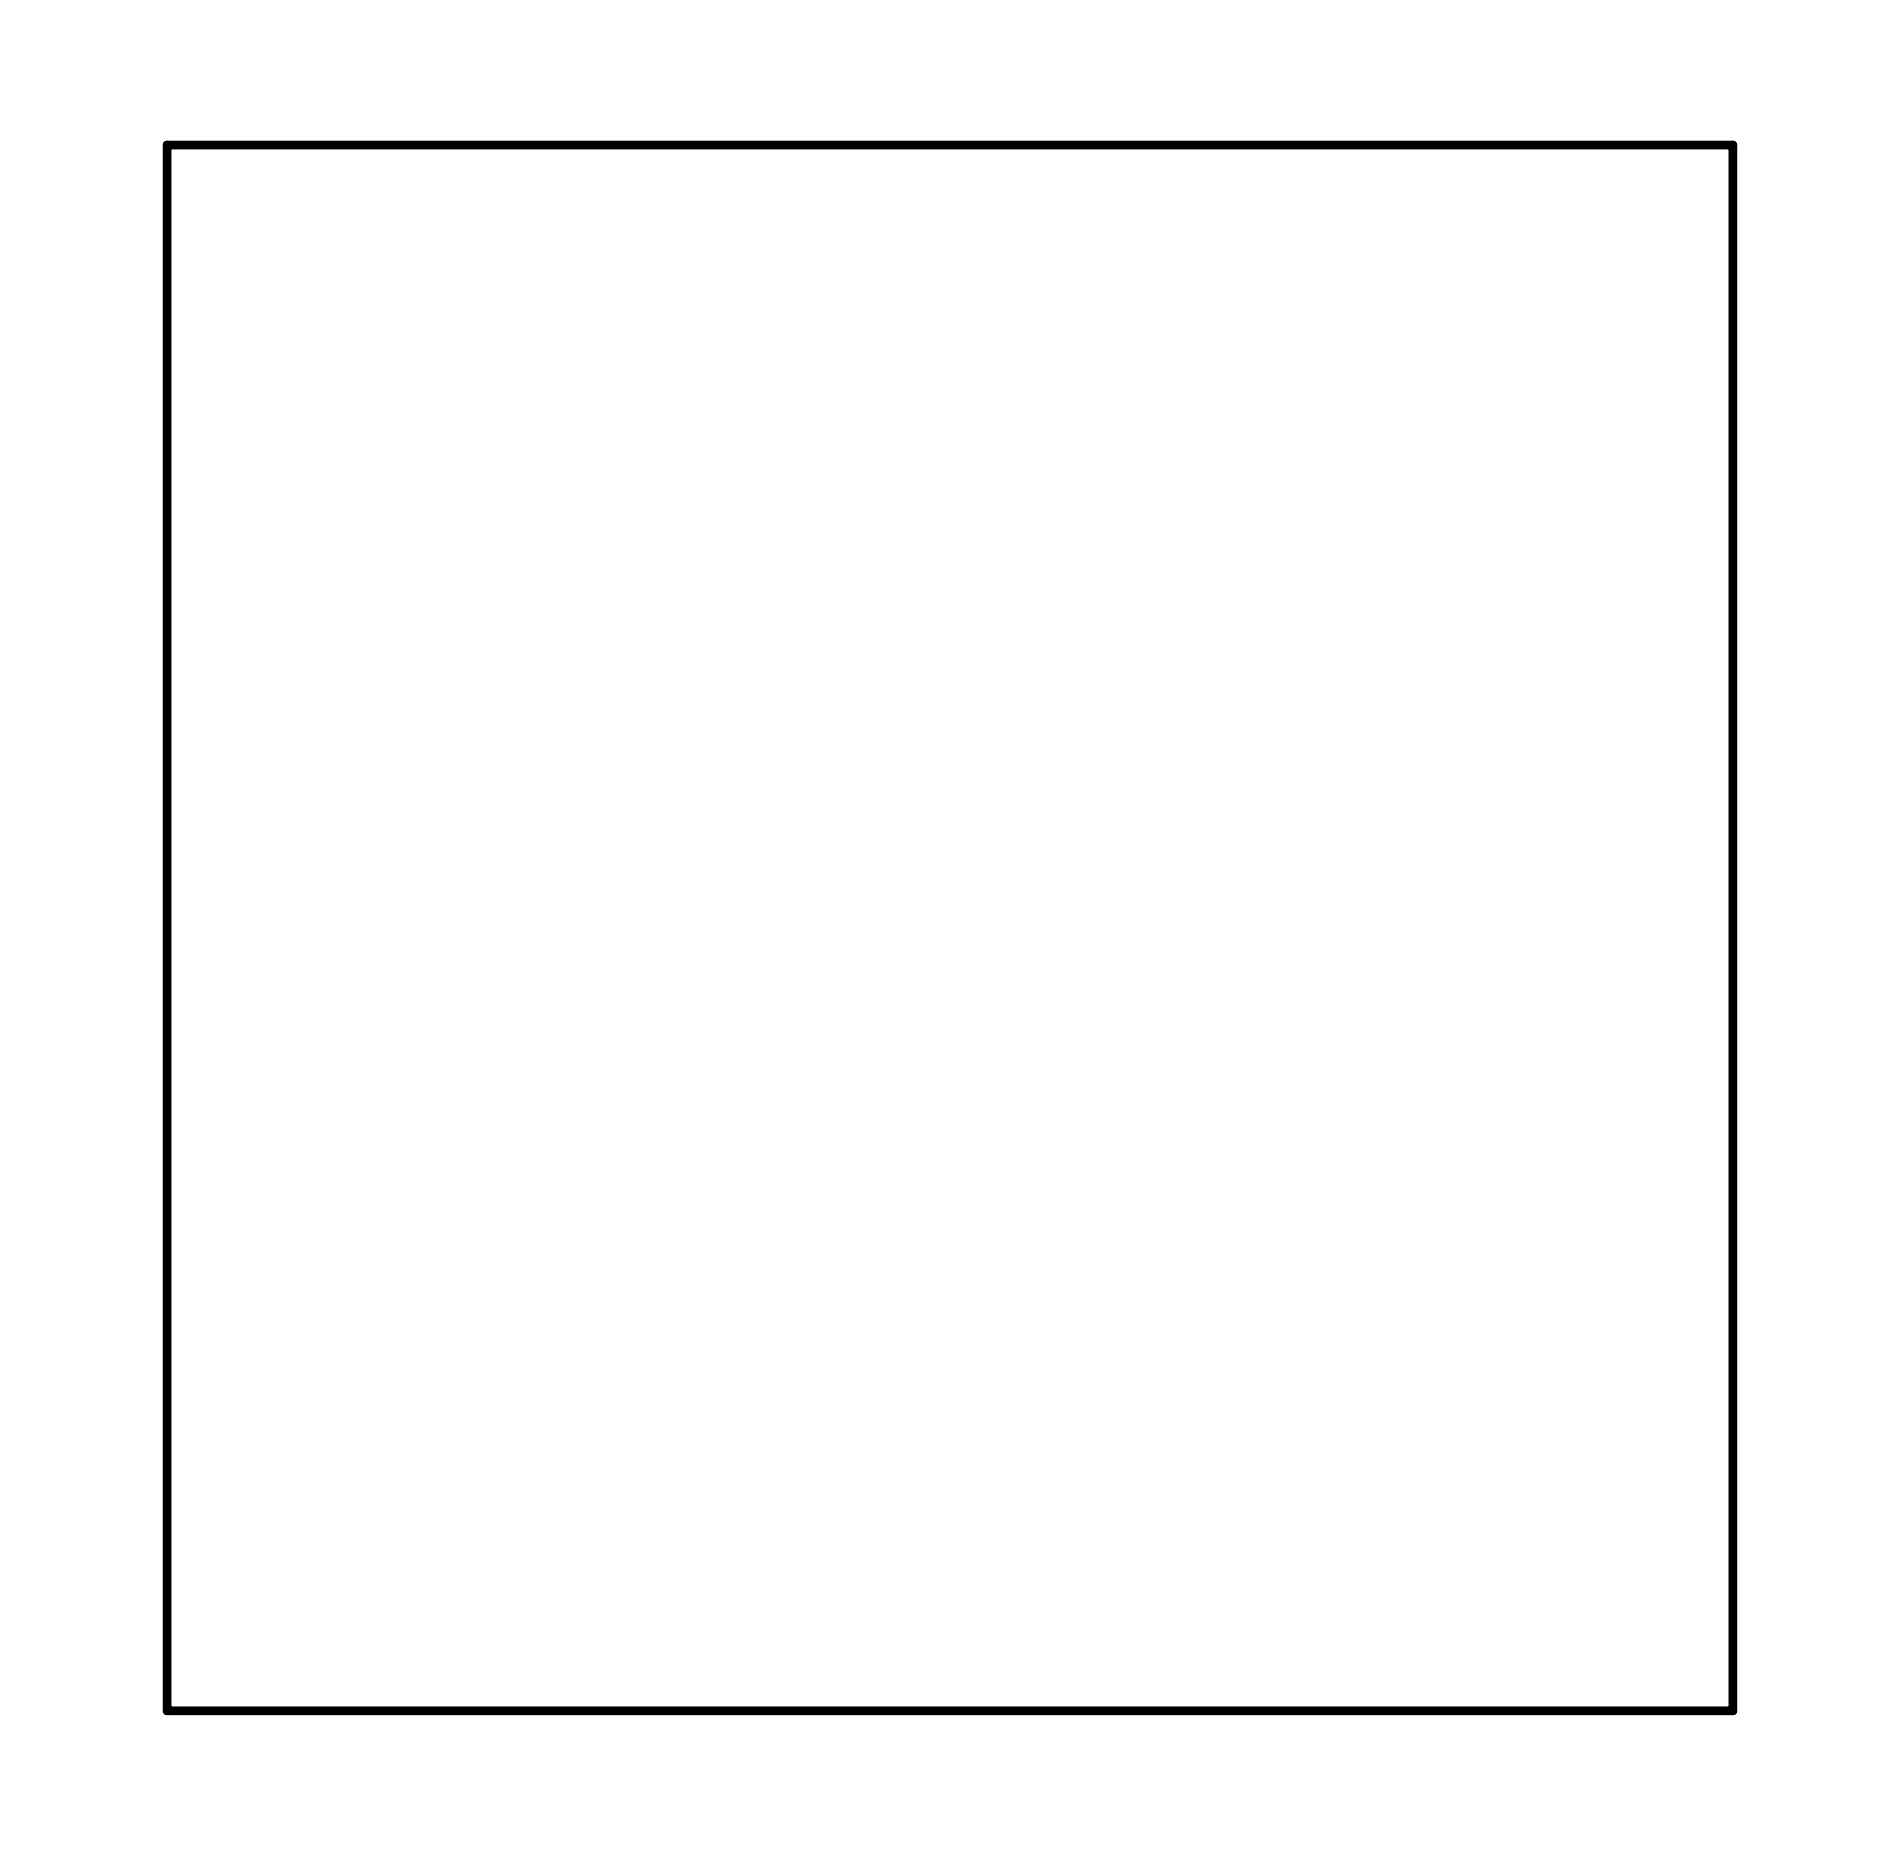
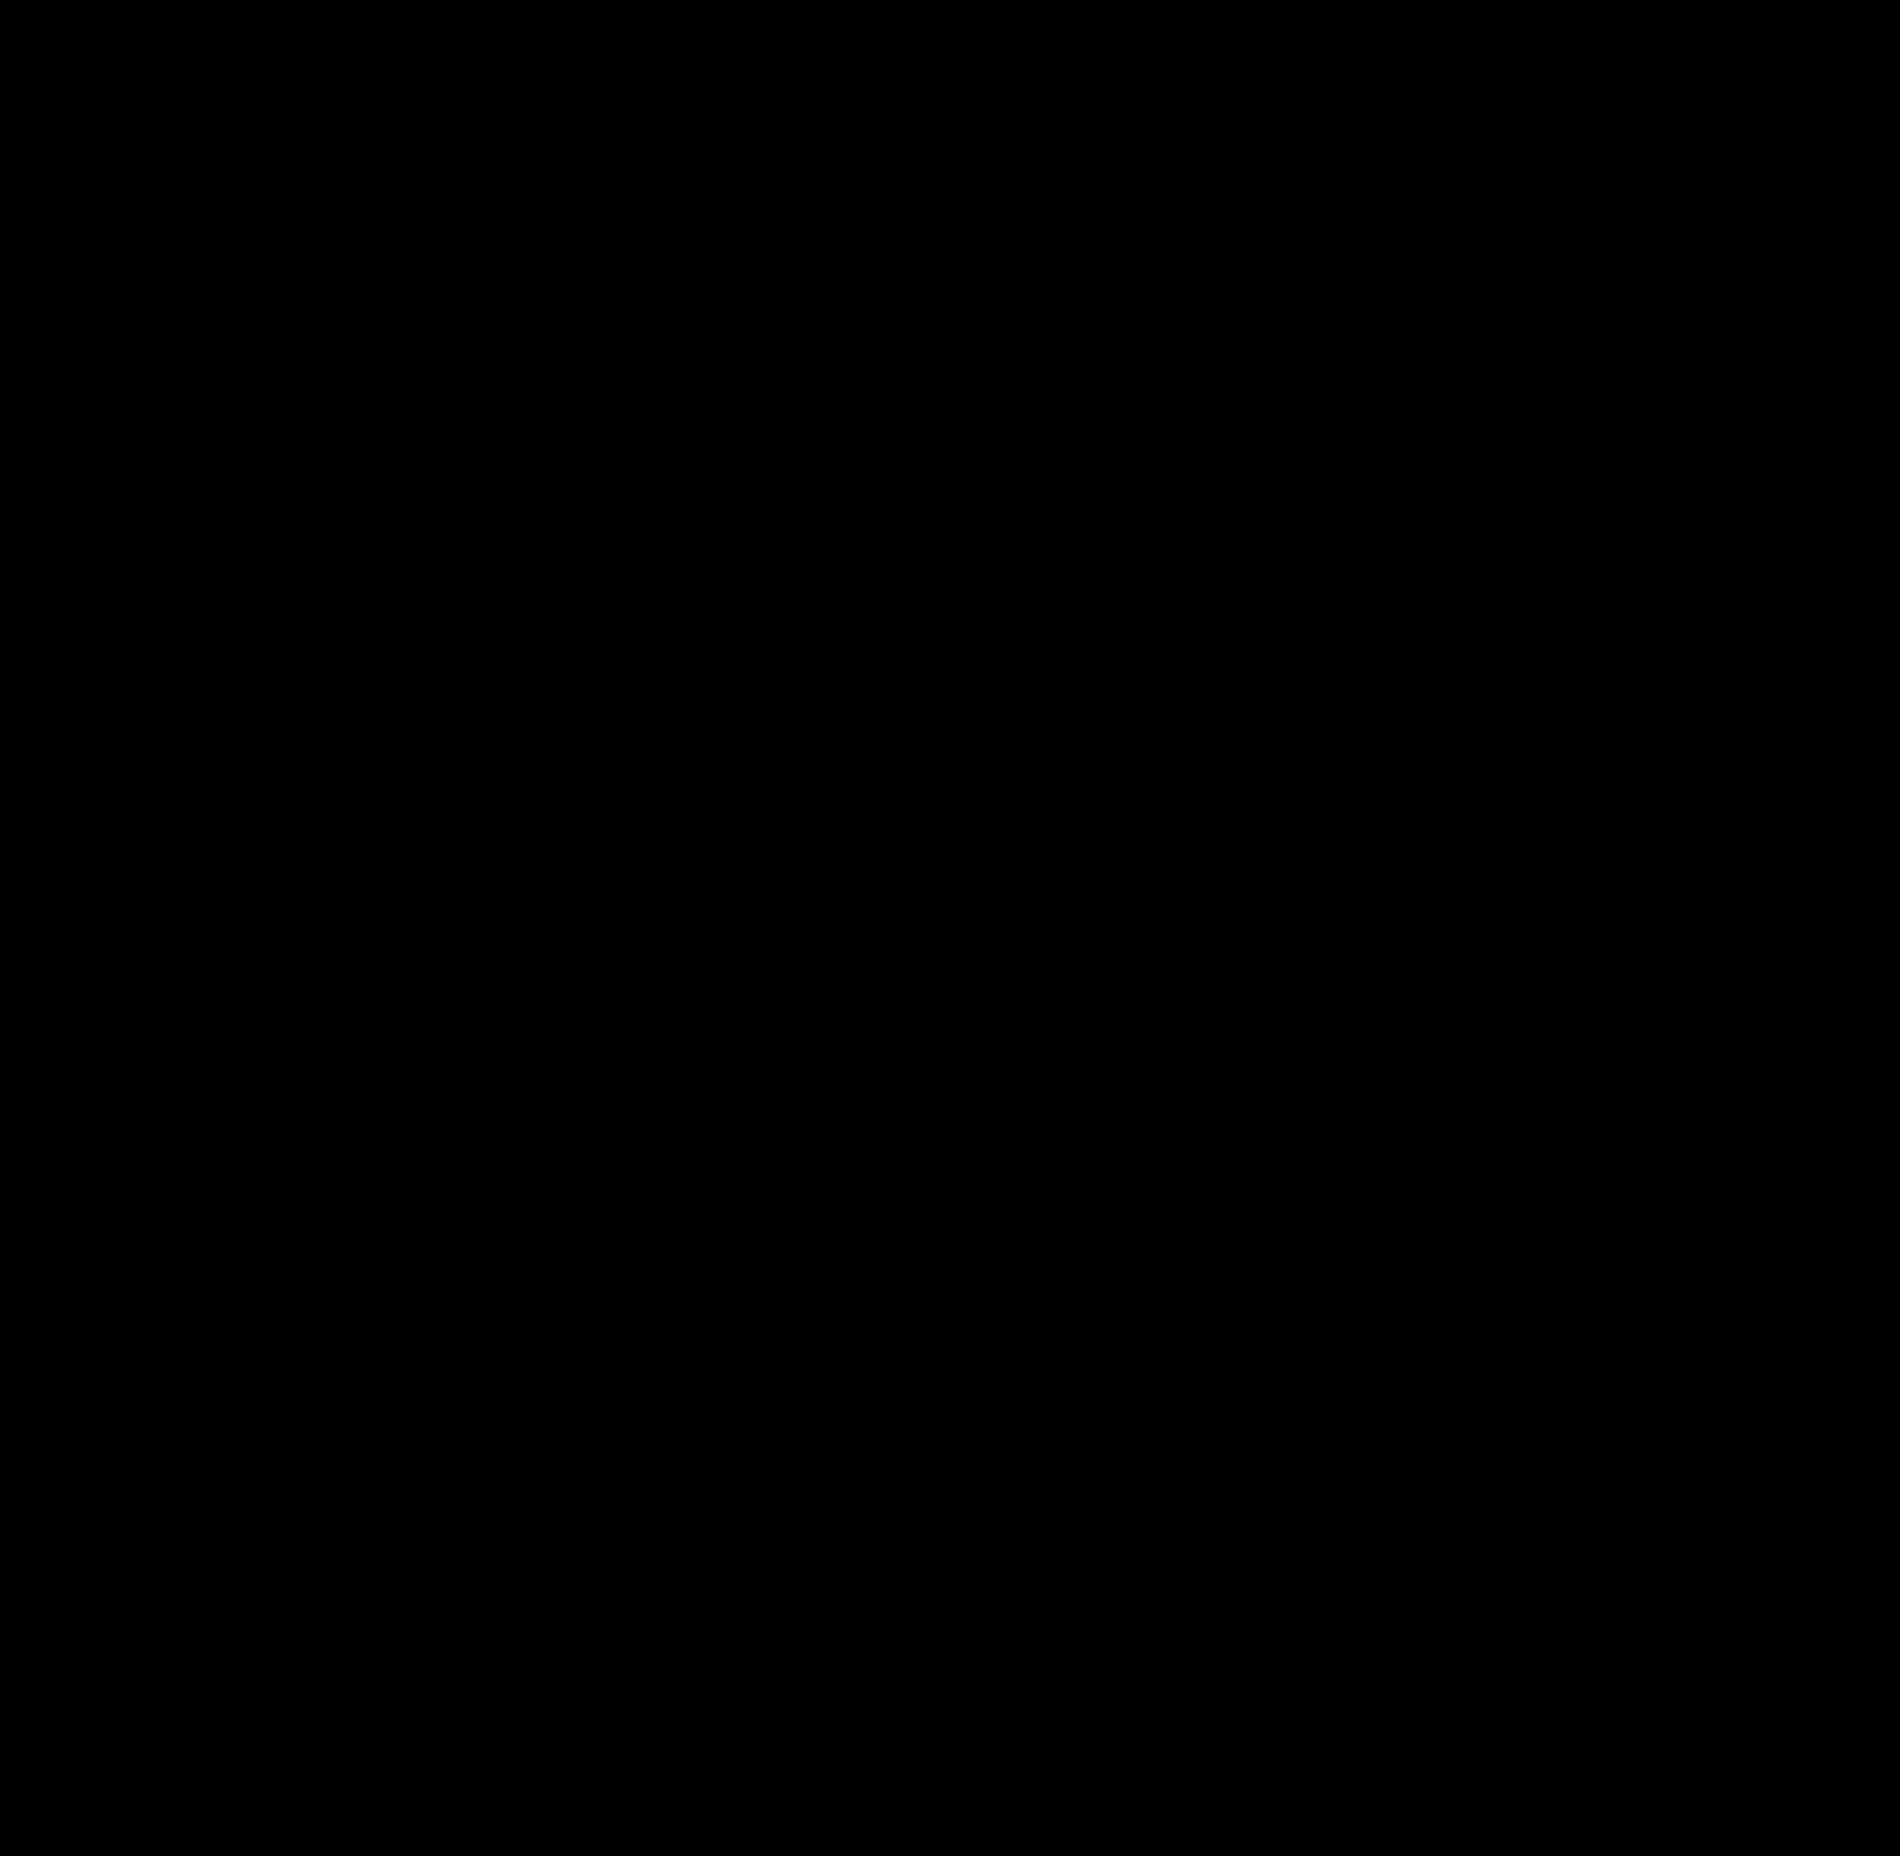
board edge: (167, 145) (1732, 145) (1732, 1710) (167, 1710) (167, 145) -> none

